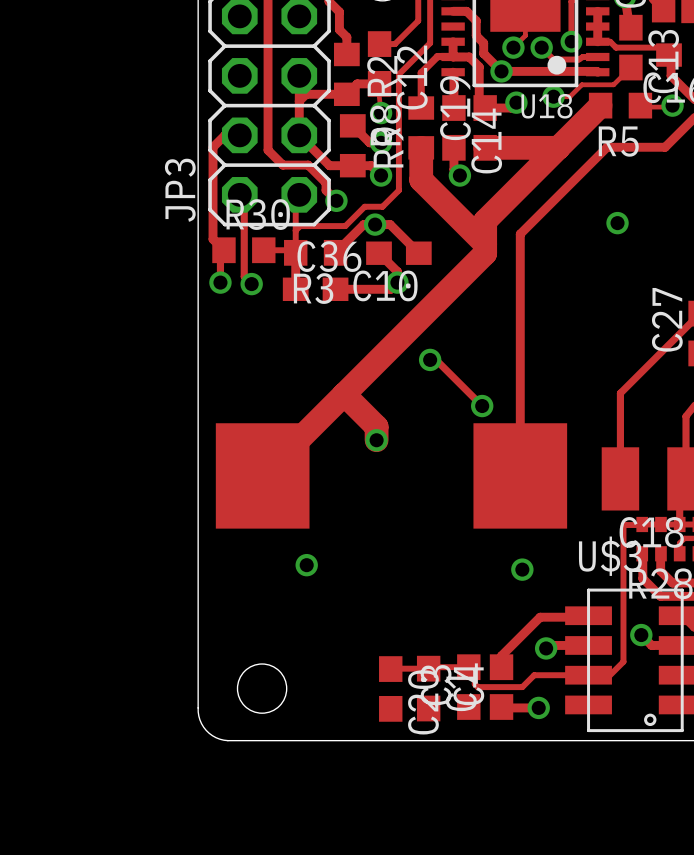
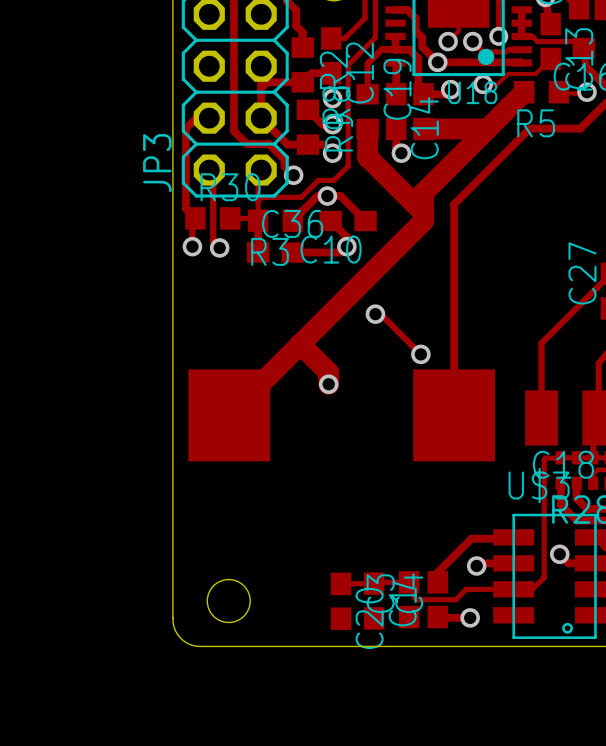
via: (617, 223) -> none
via: (306, 565) -> none
via: (522, 569) -> none

